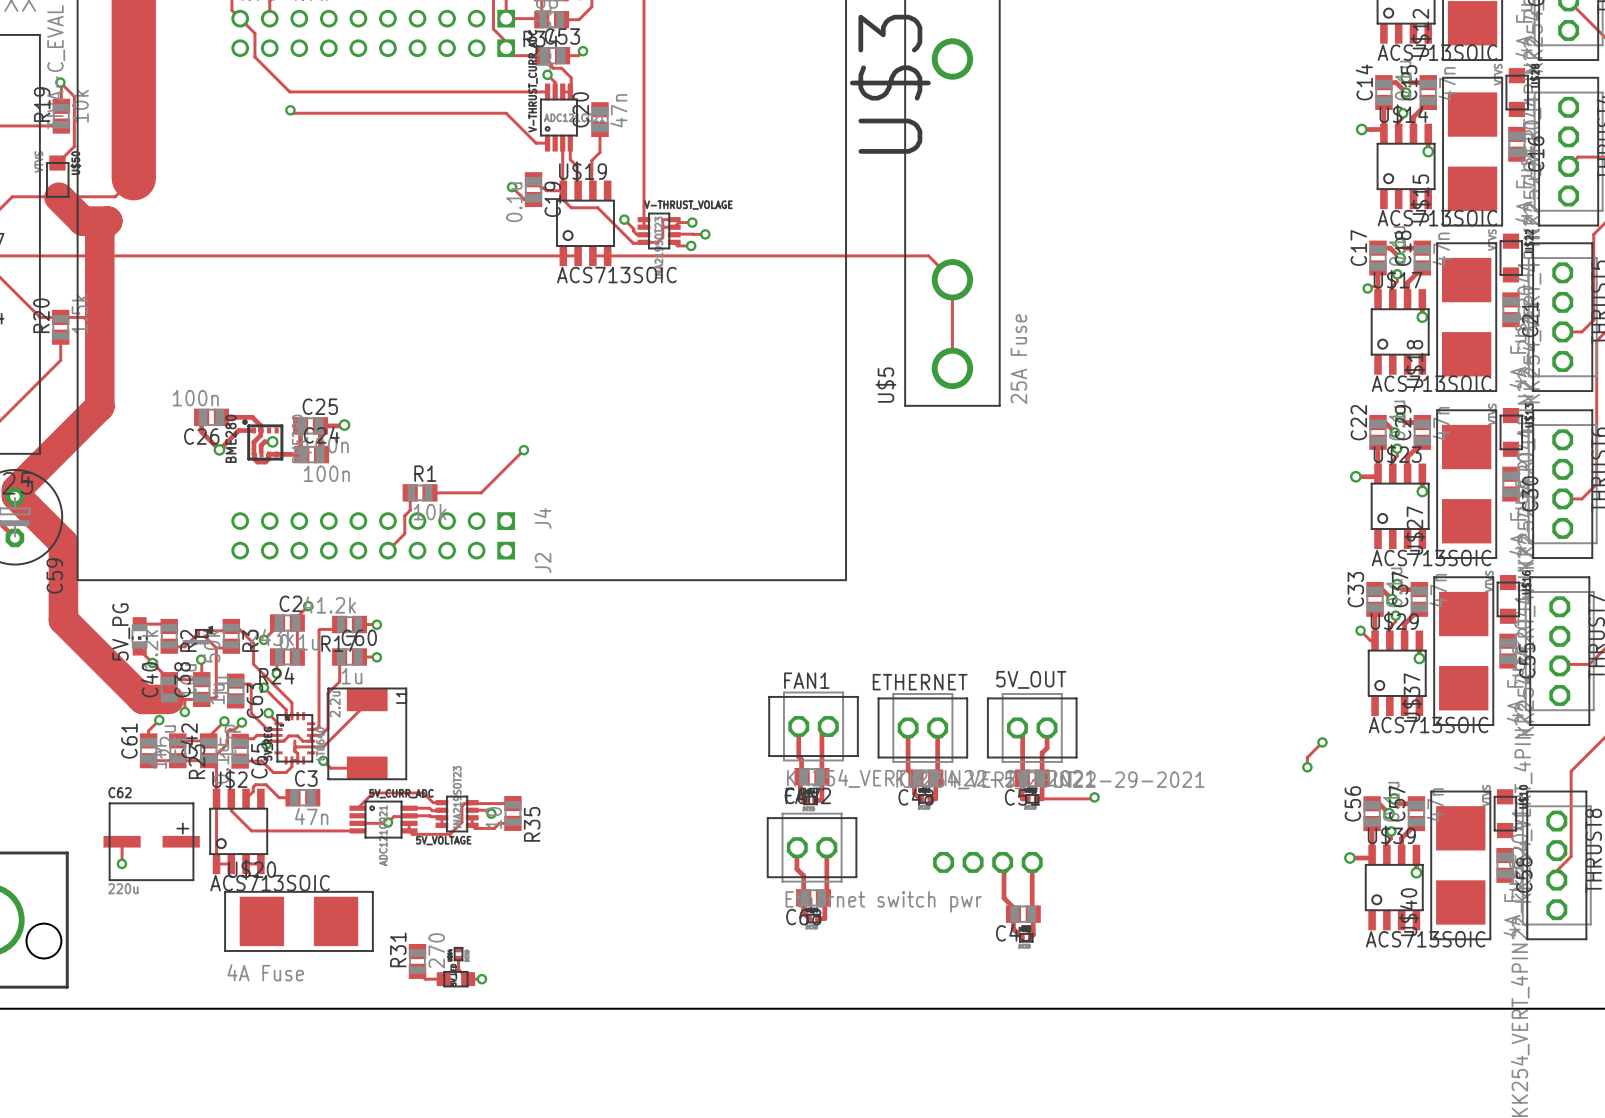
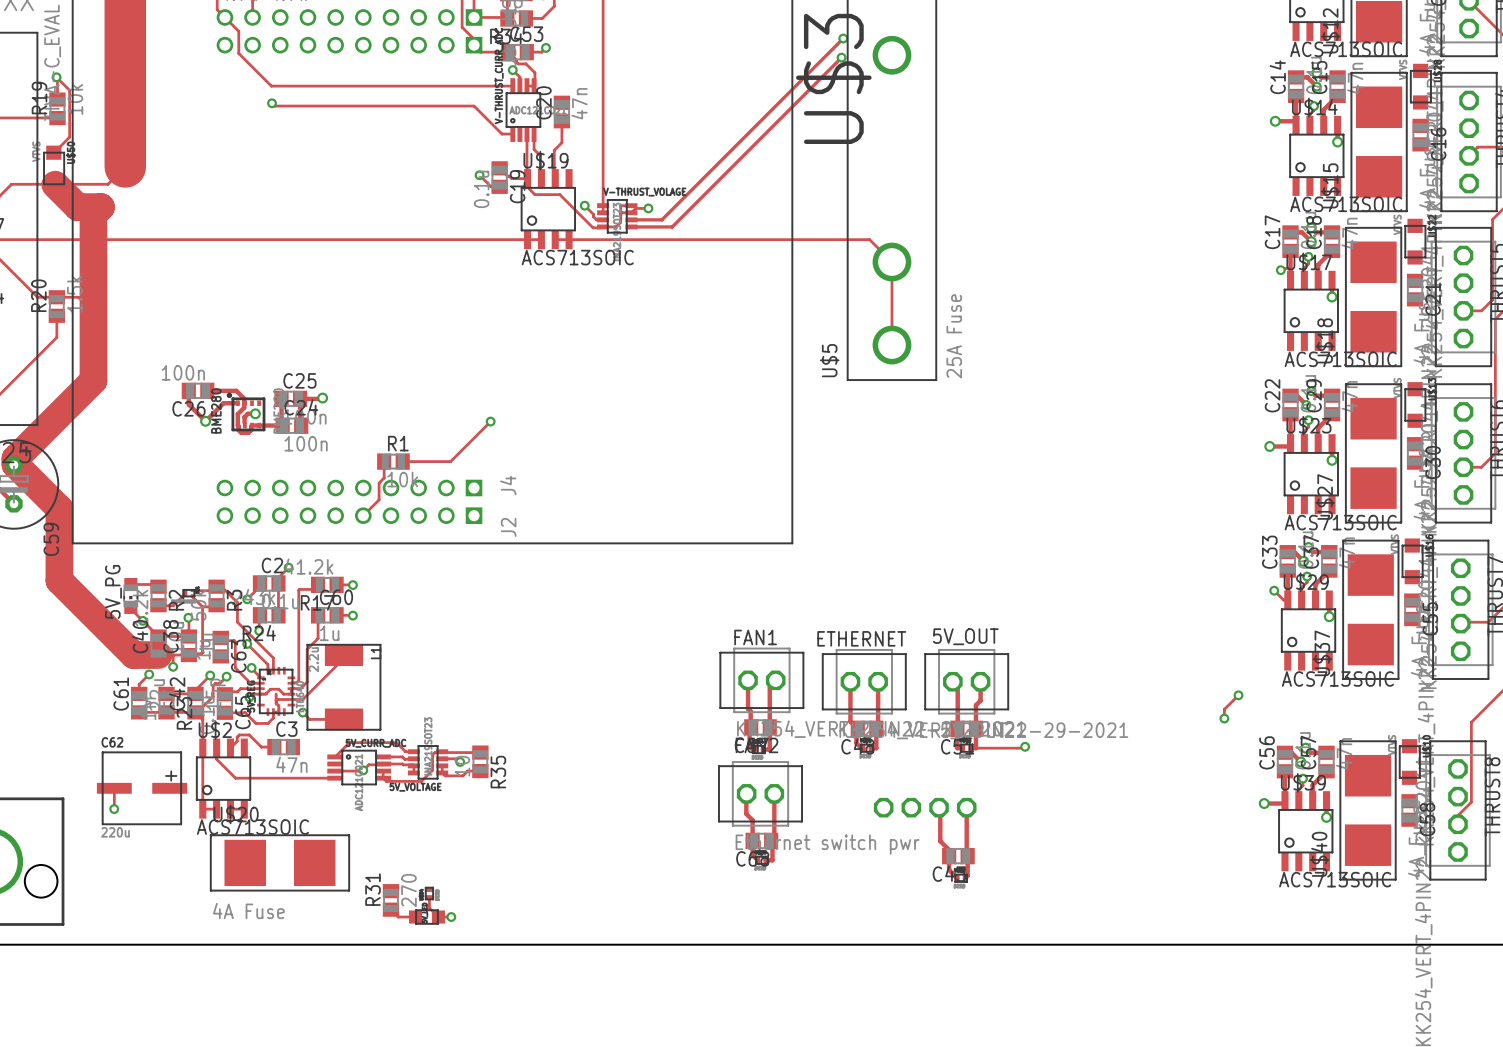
via: none -> (843, 38)
via: none -> (841, 57)
track: (705, 234) (674, 234) -> (843, 38) (661, 219) (631, 219)
via: (705, 234) -> none
track: (674, 242) (677, 245) (691, 245) -> (631, 226) (672, 226) (841, 57)
via: (691, 245) -> none

